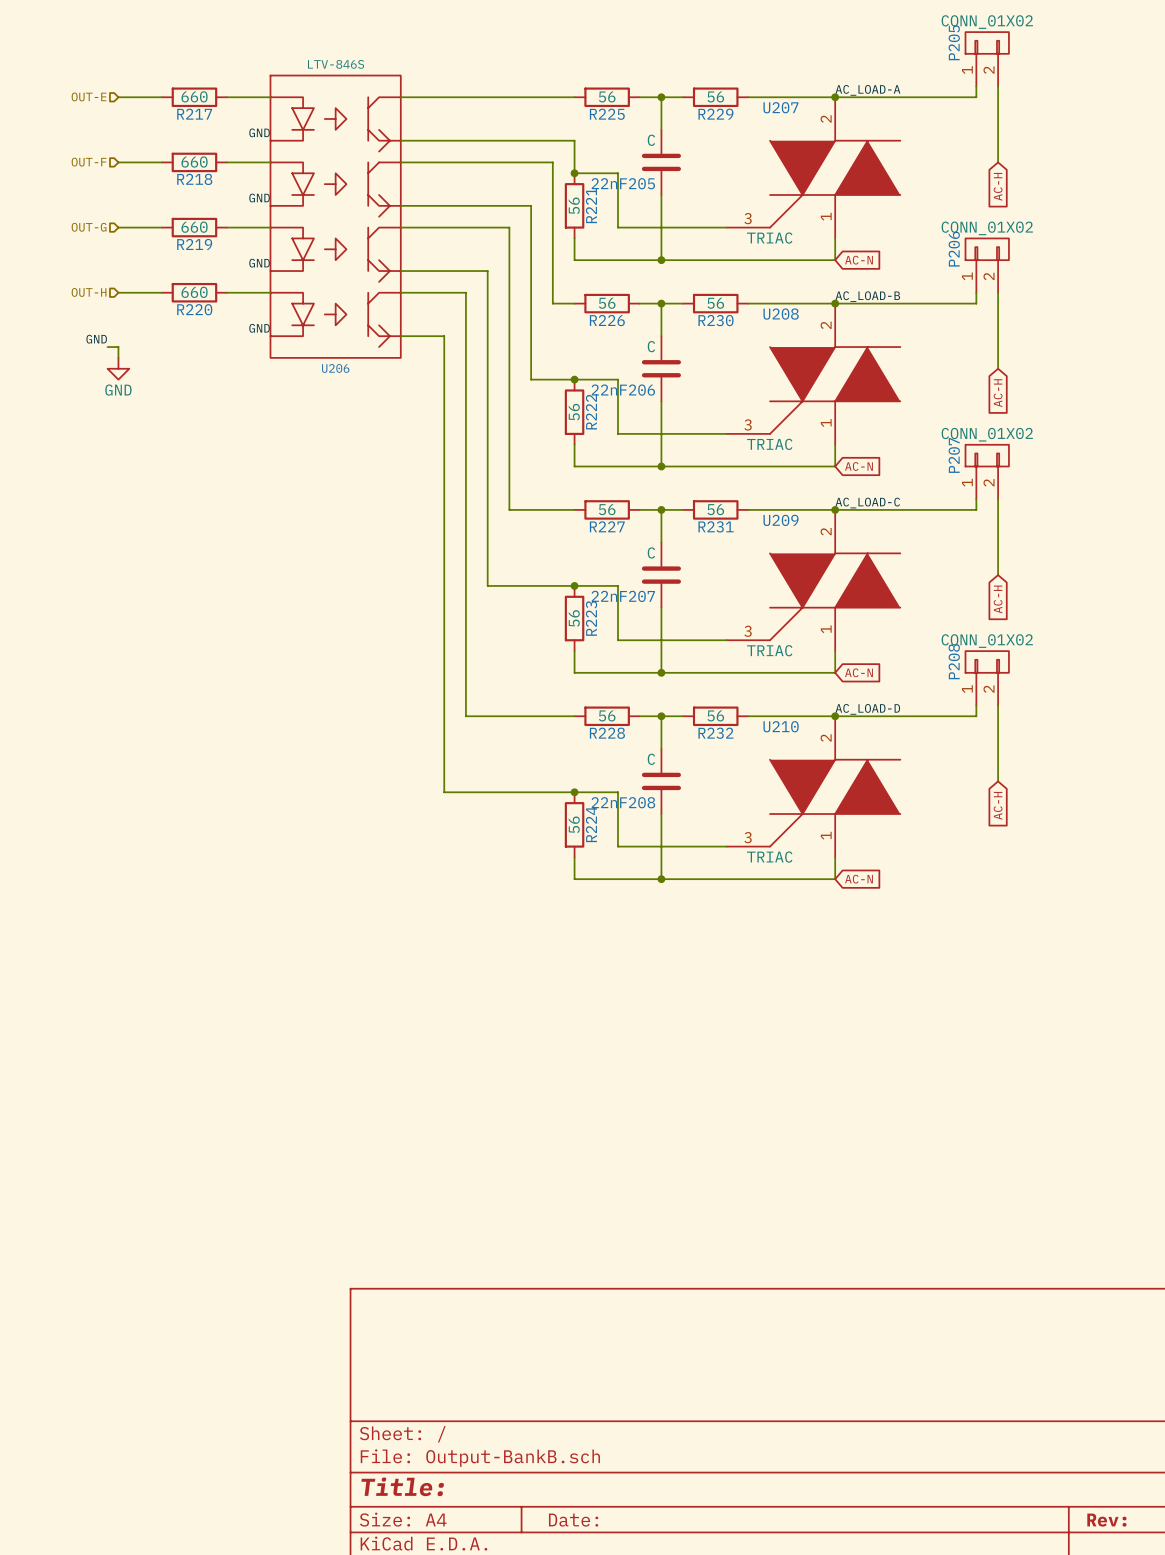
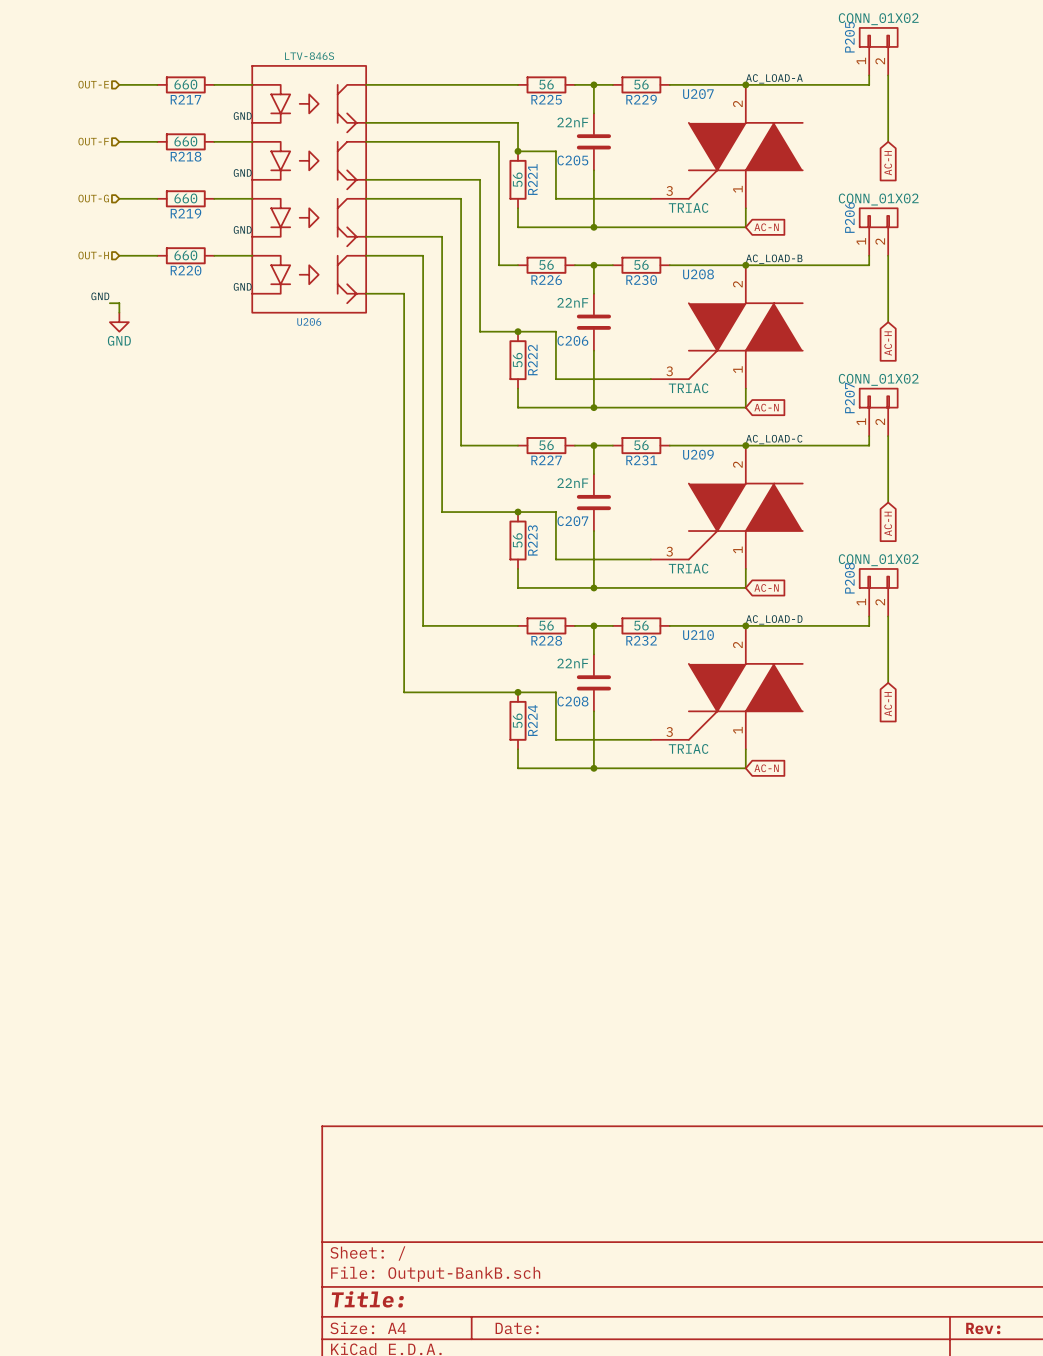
22nF205 value: C (651, 140) -> 22nF (572, 122)
22nF205 name: 22nF205 (623, 183) -> C205 (572, 160)
22nF206 value: C (651, 346) -> 22nF (572, 302)
22nF206 name: 22nF206 (623, 390) -> C206 (572, 340)
22nF207 value: C (651, 552) -> 22nF (572, 483)
22nF207 name: 22nF207 (623, 596) -> C207 (572, 521)
22nF208 value: C (651, 759) -> 22nF (572, 663)
22nF208 name: 22nF208 (623, 802) -> C208 (572, 701)

